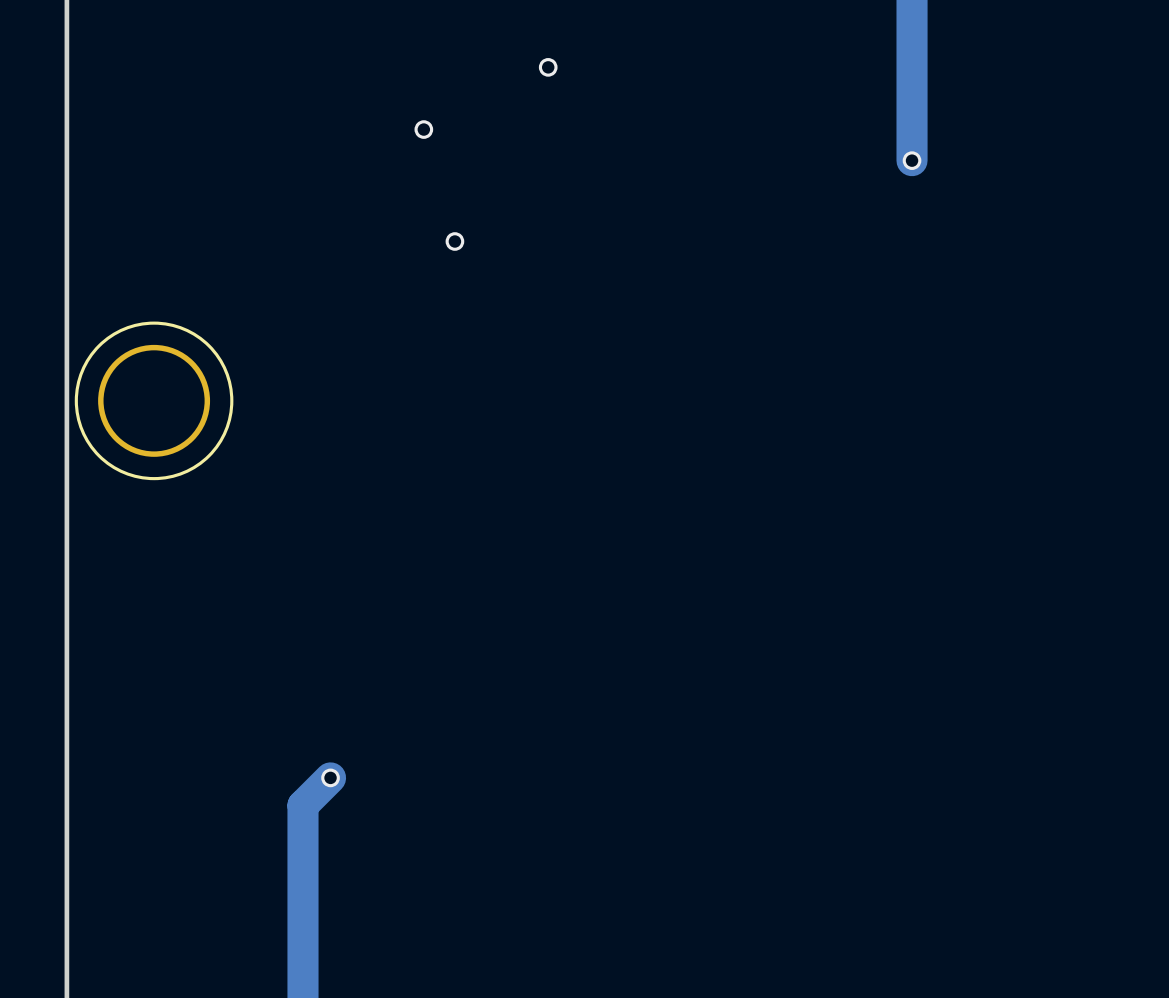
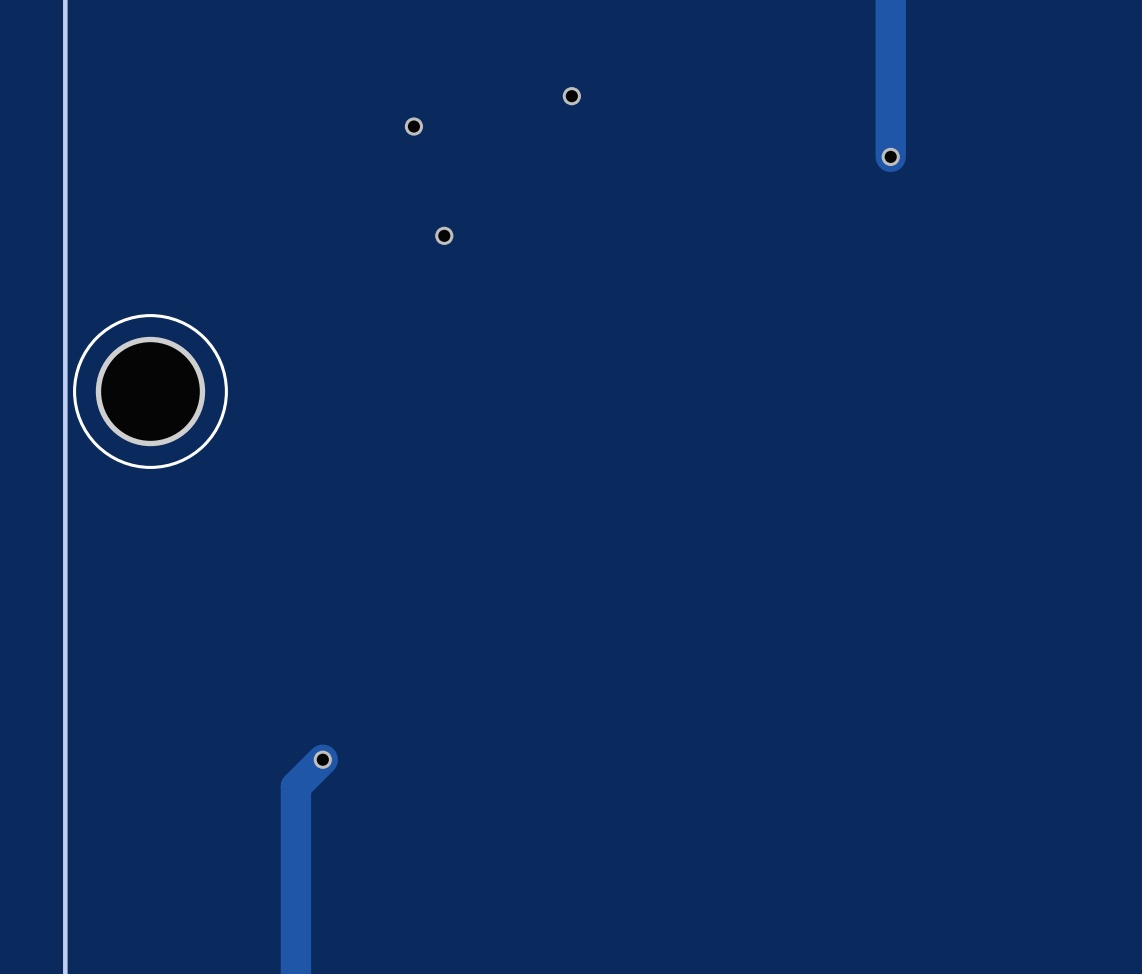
via position: (548, 67) -> (571, 96)

